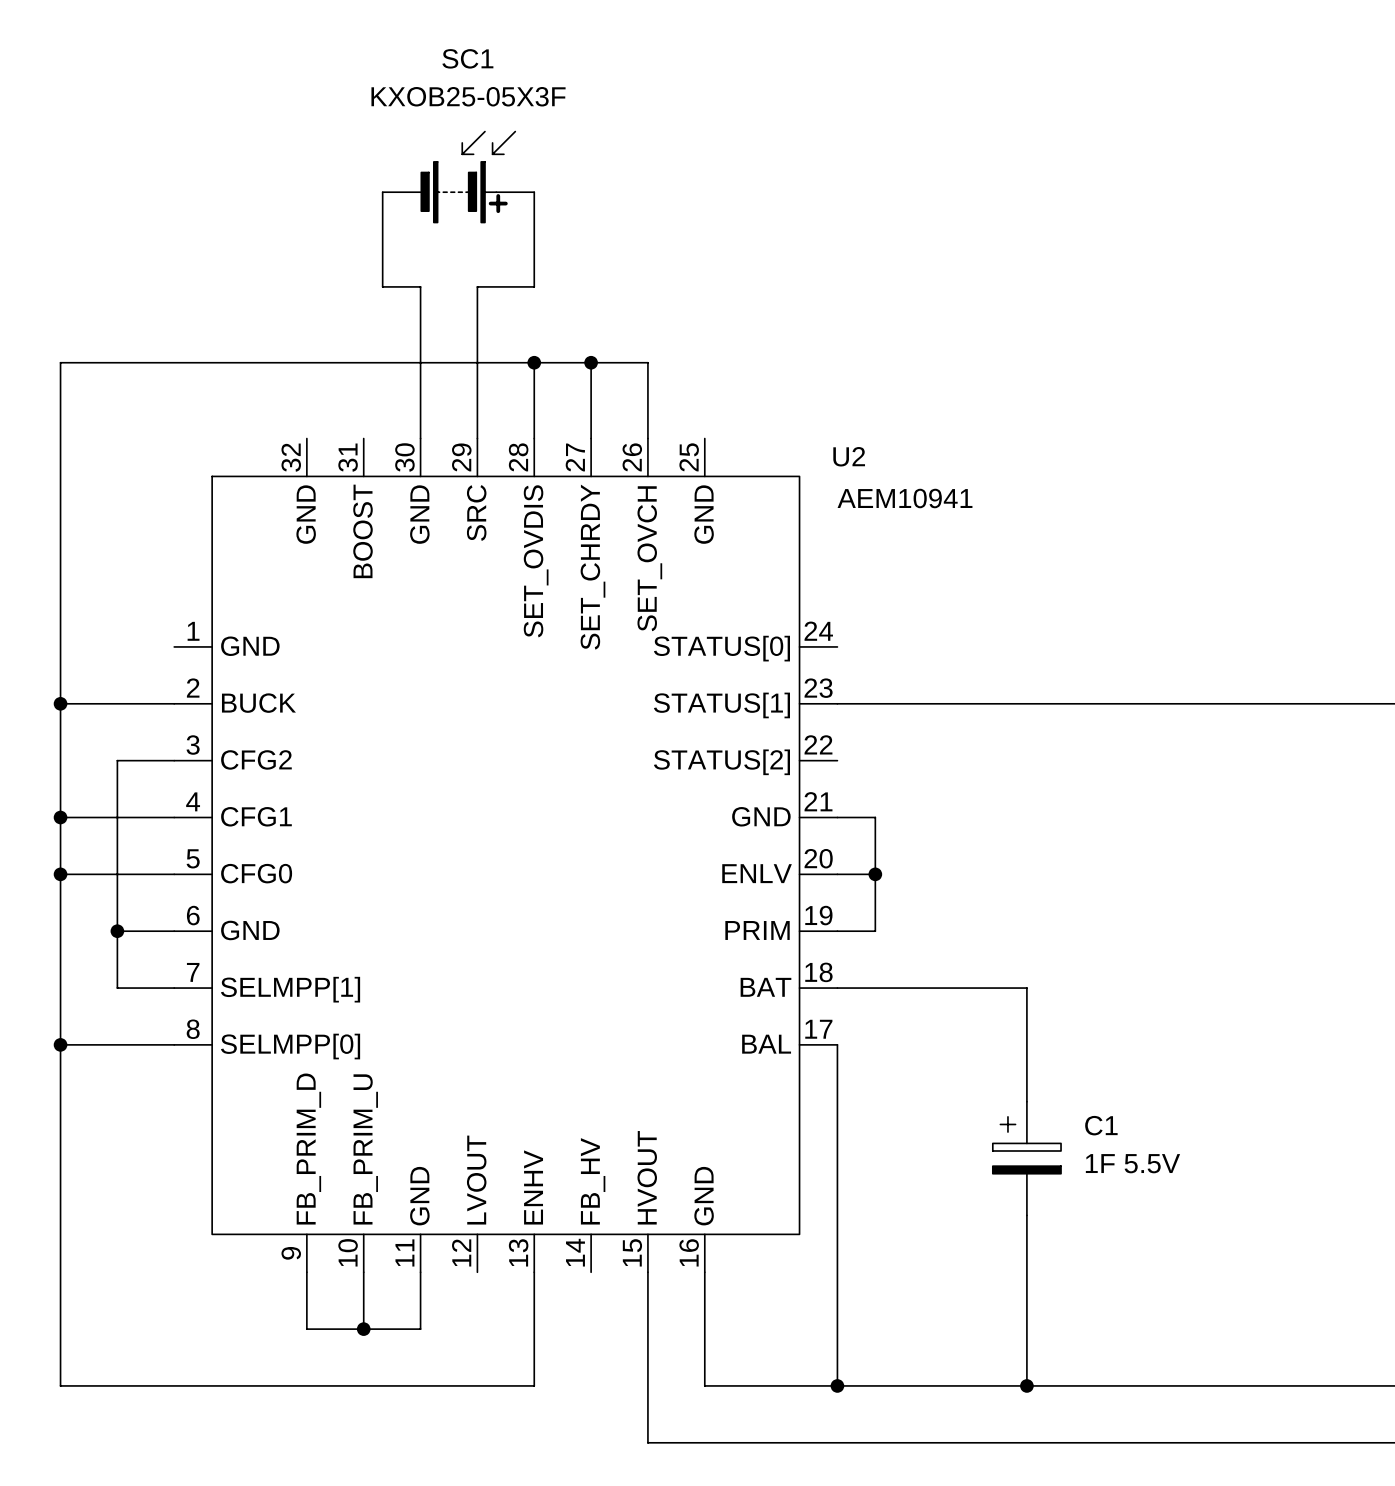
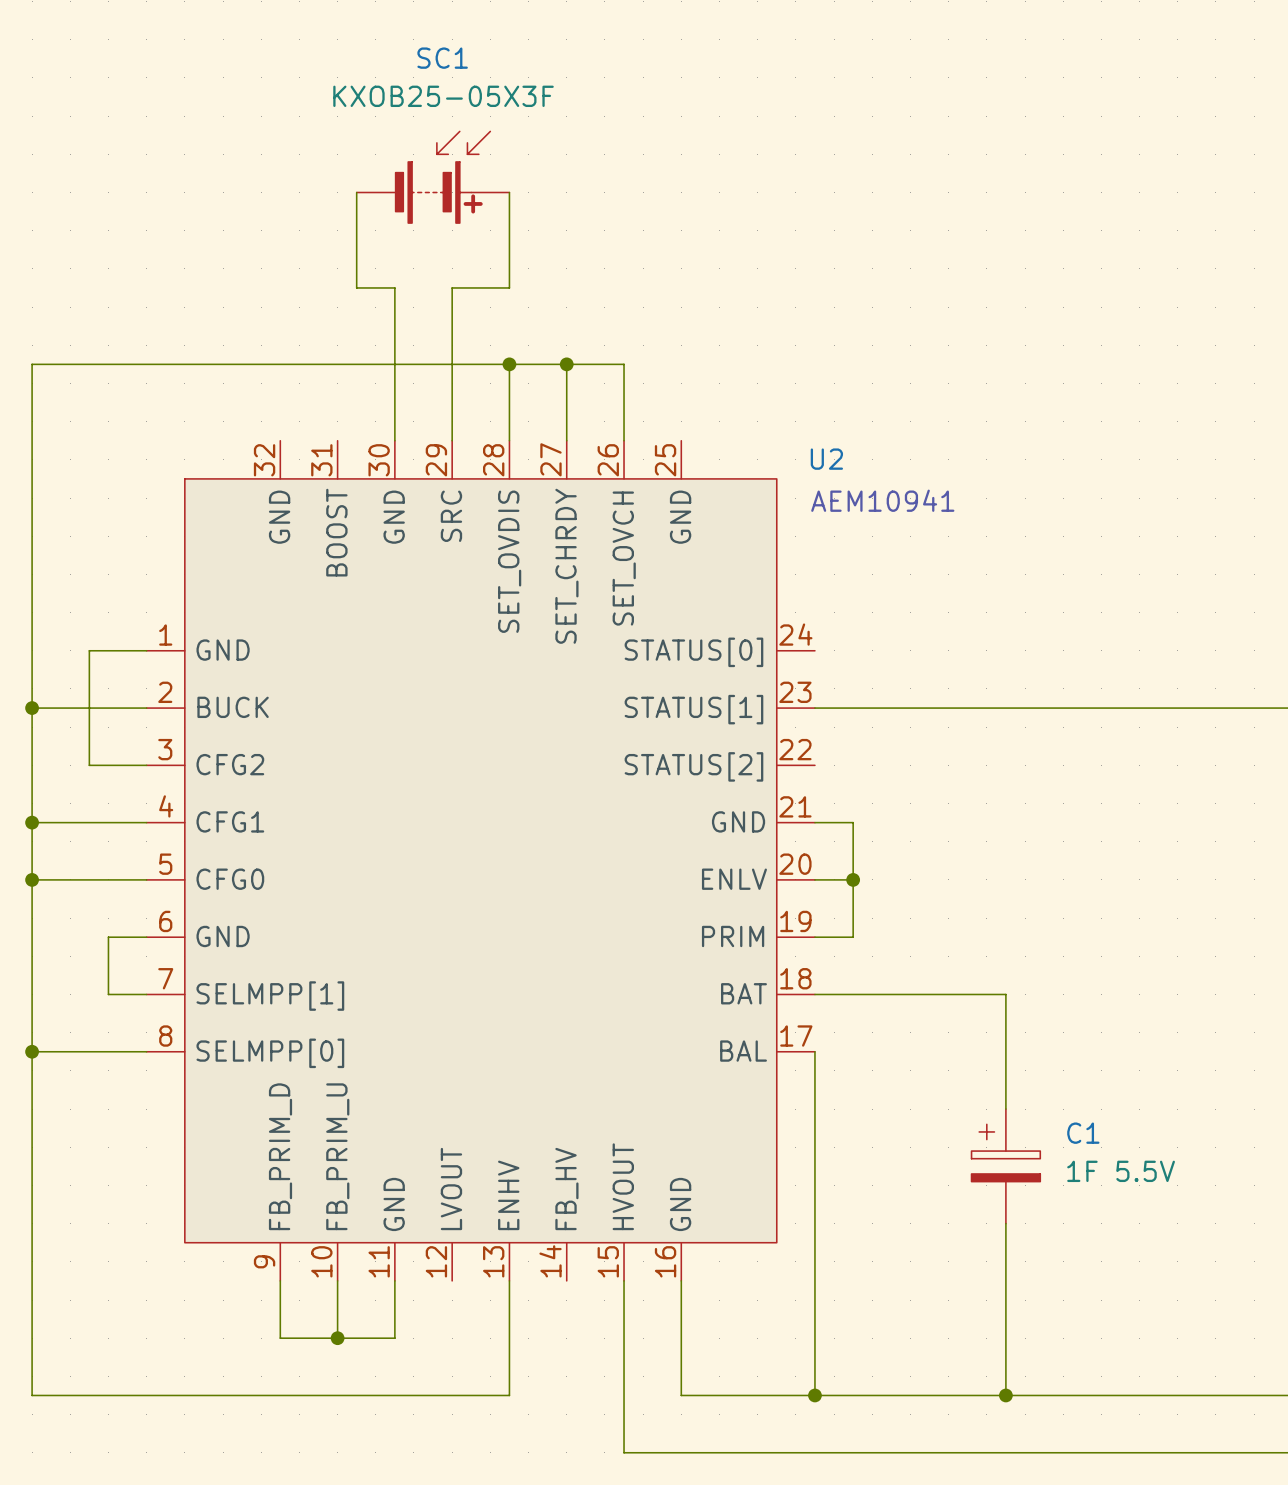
wire: (117, 760) (117, 988) (136, 988) -> (89, 765) (89, 650) (146, 650)
wire: (117, 931) (136, 931) -> (108, 994) (108, 937)
junction: (117, 931) -> none

